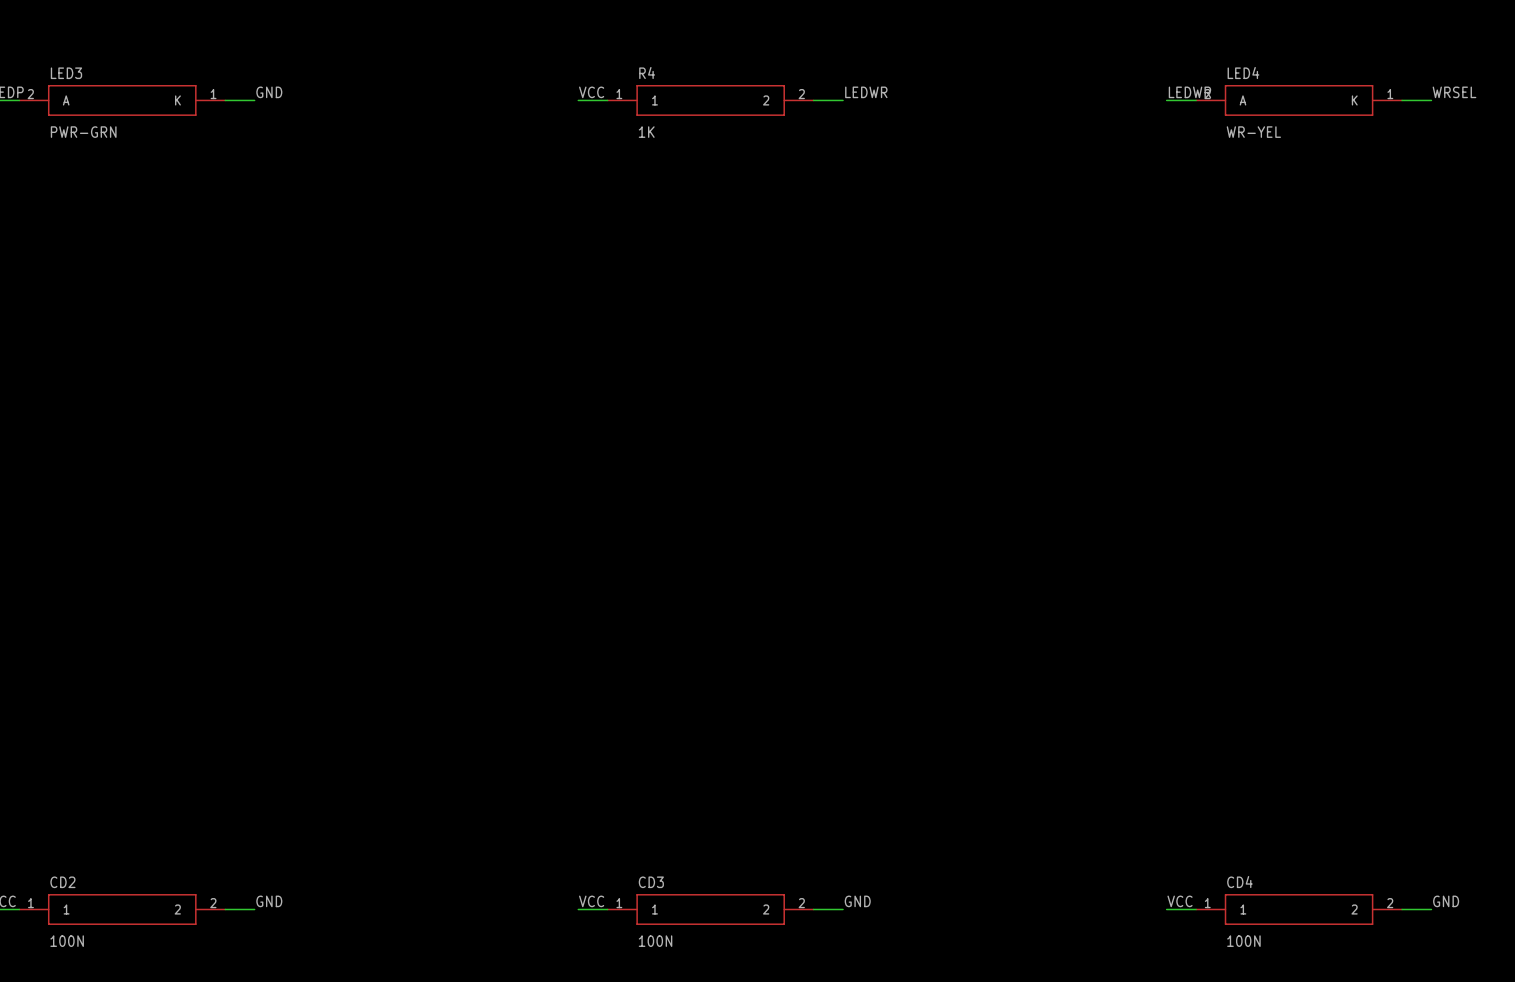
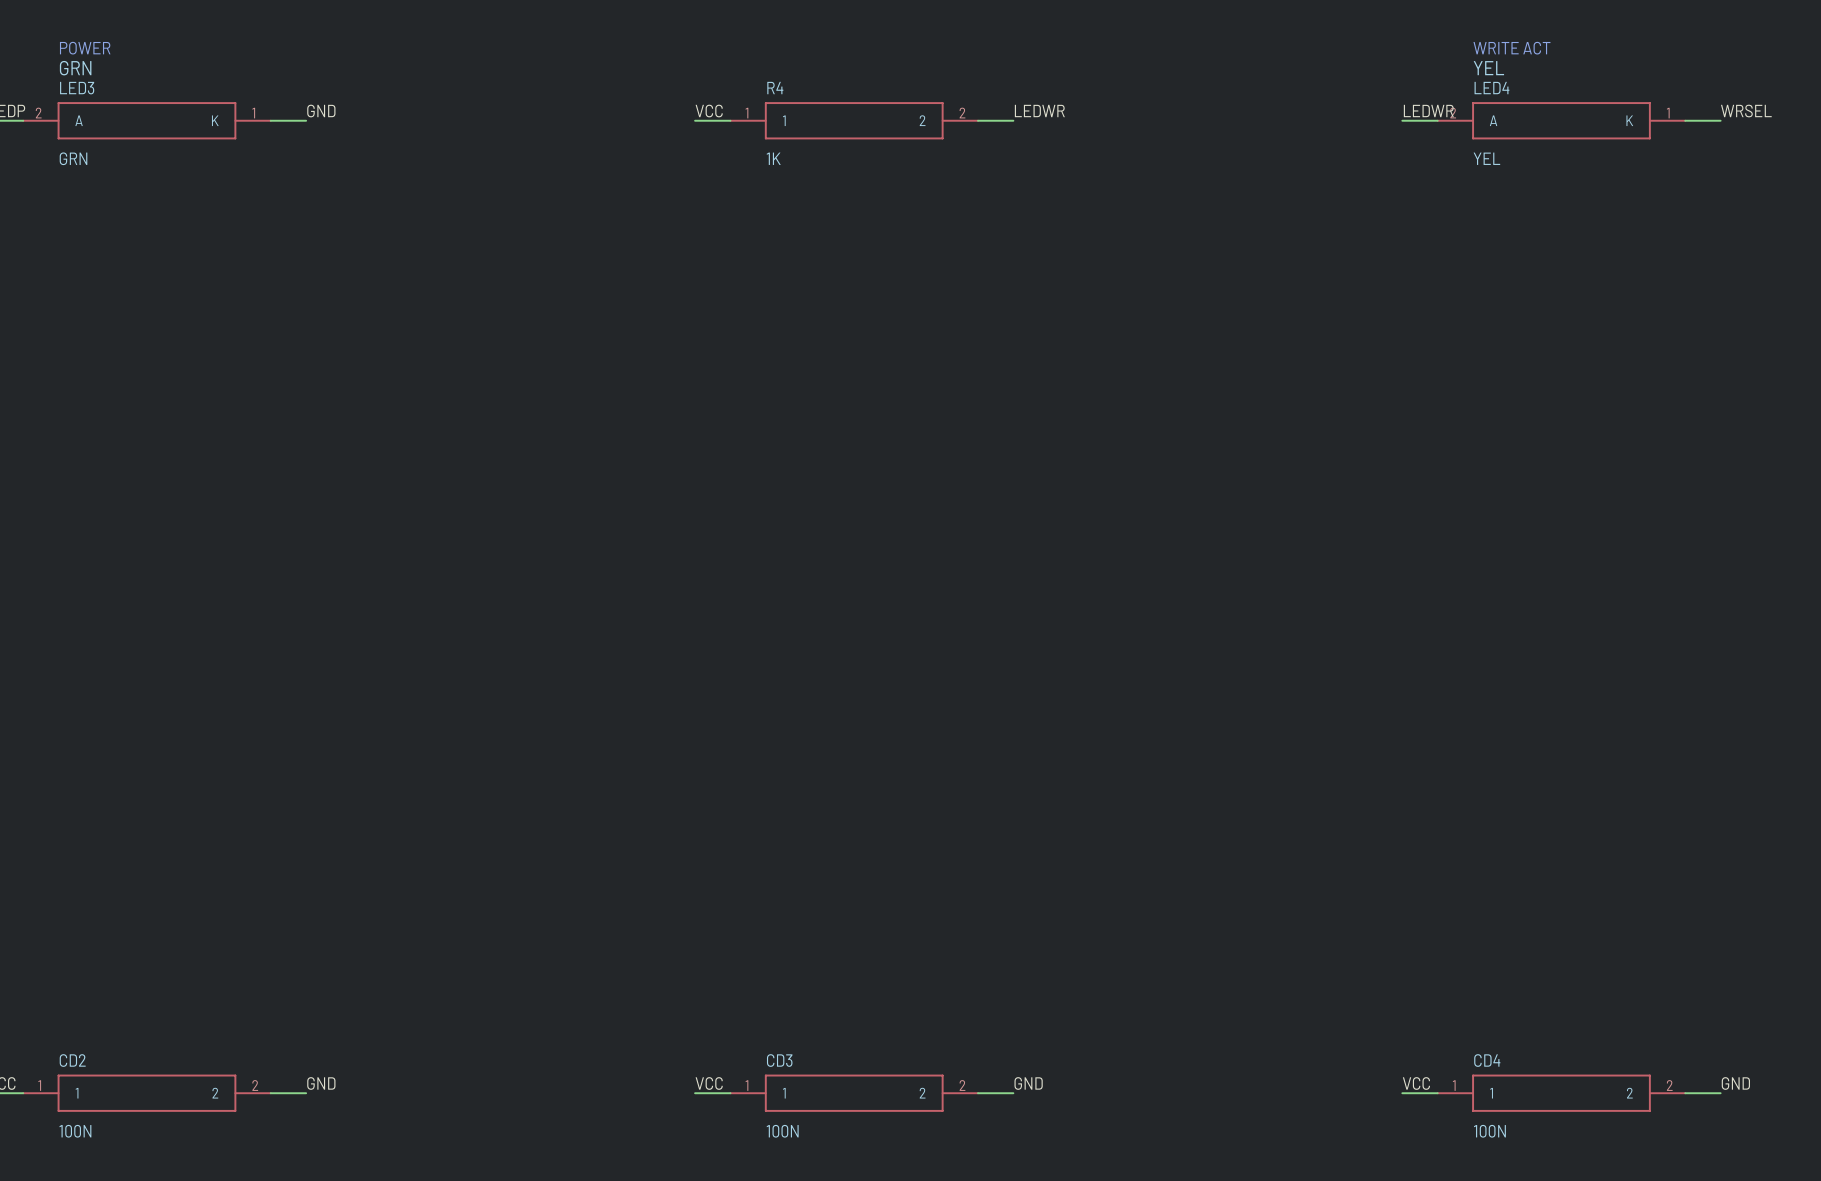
text: none -> POWER (85, 48)
text: none -> WRITE ACT (1511, 48)
text: none -> GRN (75, 68)
text: none -> YEL (1488, 68)
LED3 value: PWR-GRN (83, 132) -> GRN (73, 158)
LED4 value: WR-YEL (1253, 132) -> YEL (1486, 158)

